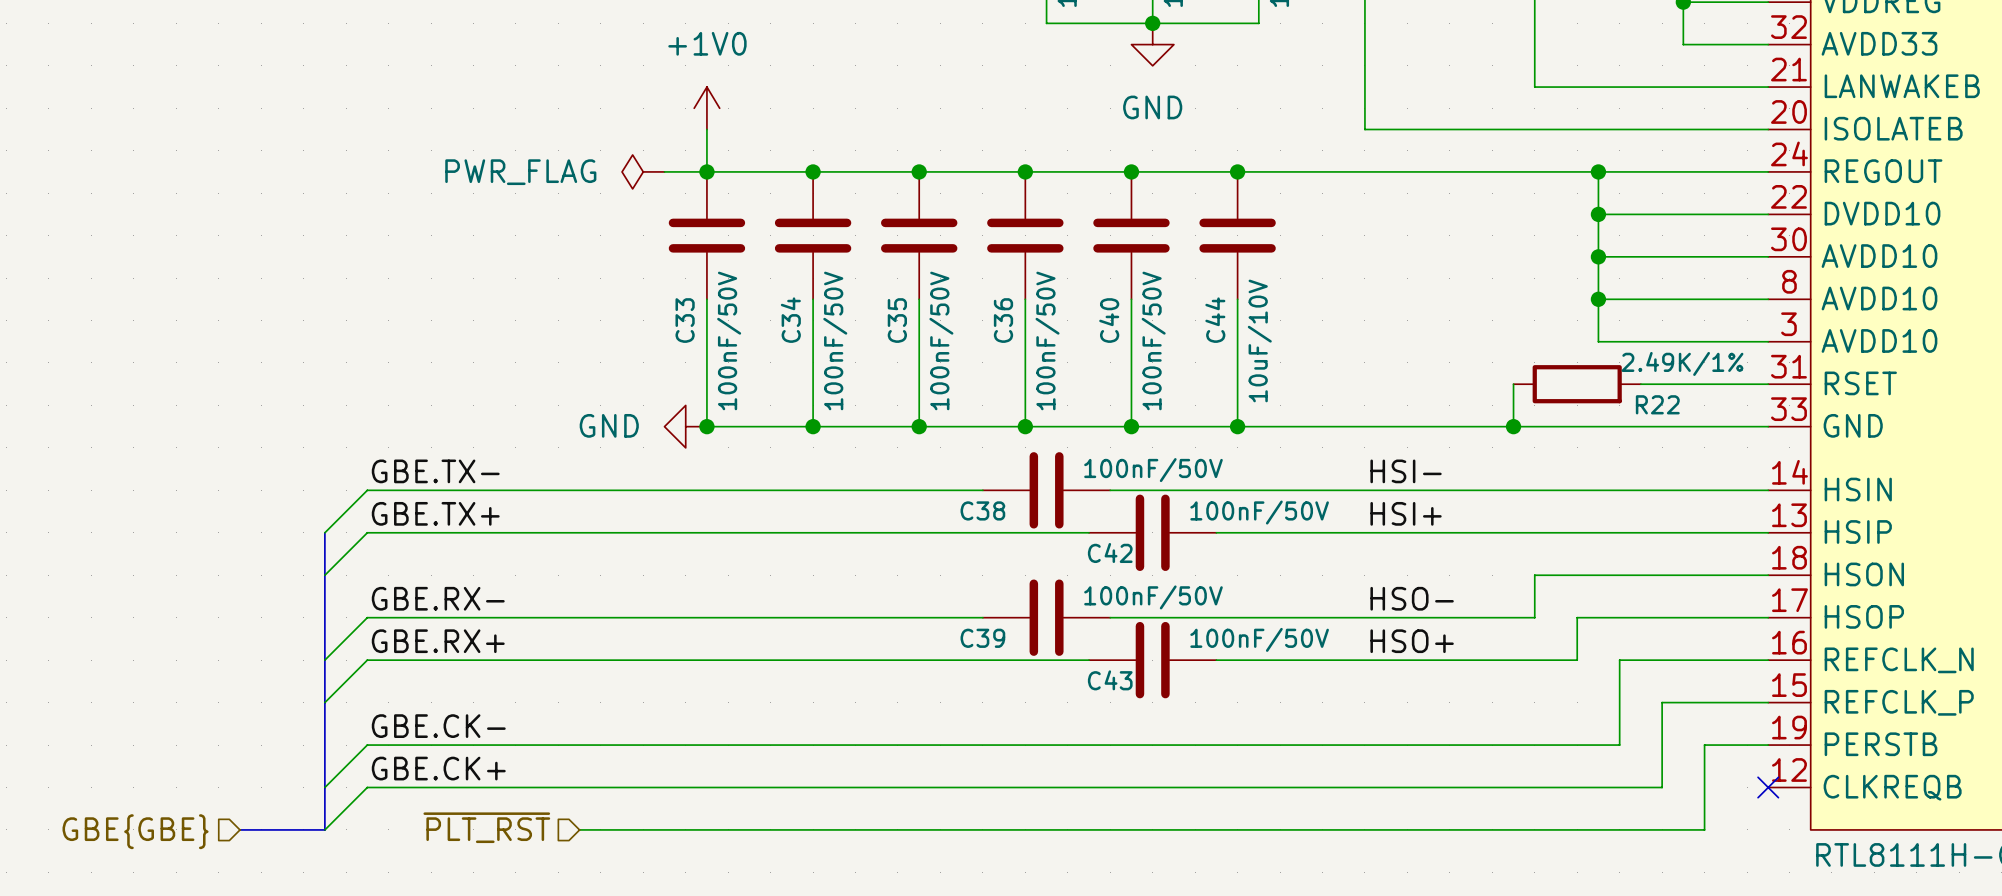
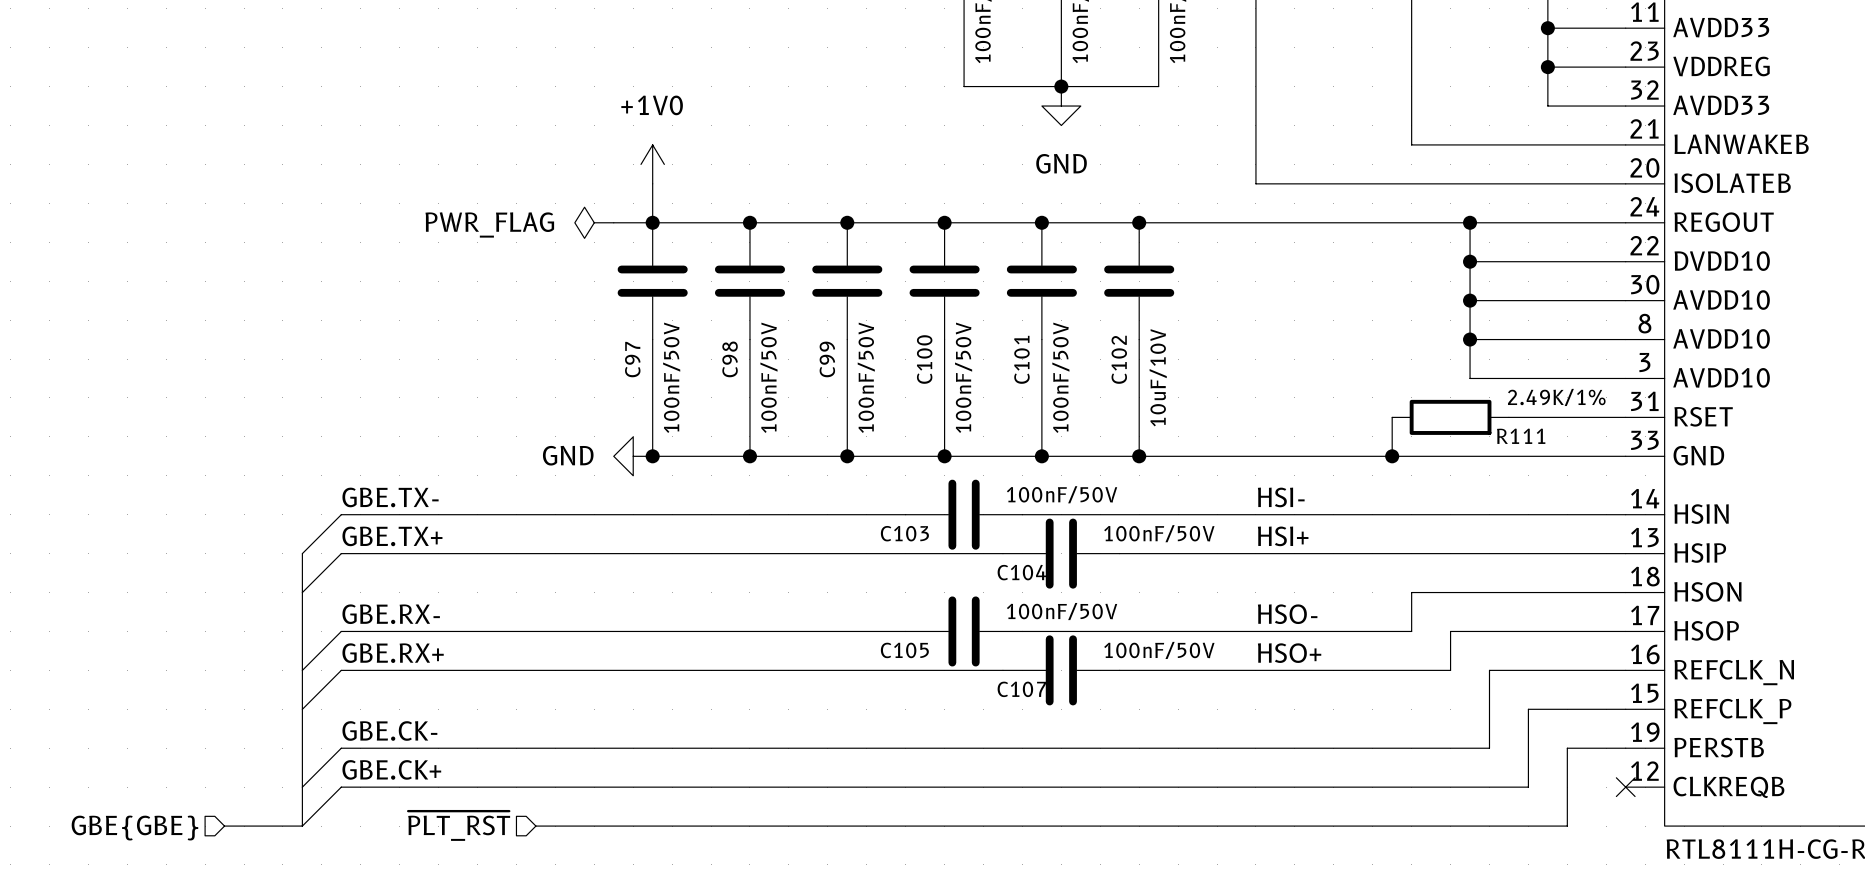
C33 name: C33 (685, 320) -> C97 (632, 359)
C34 name: C34 (790, 320) -> C98 (730, 359)
C35 name: C35 (897, 320) -> C99 (827, 359)
C36 name: C36 (1003, 320) -> C100 (924, 359)
C40 name: C40 (1109, 320) -> C101 (1021, 359)
C44 name: C44 (1215, 320) -> C102 (1119, 359)
R22 name: R22 (1657, 404) -> R111 (1521, 436)
C38 name: C38 (982, 510) -> C103 (904, 533)
C42 name: C42 (1110, 552) -> C104 (1021, 572)
C39 name: C39 (982, 638) -> C105 (904, 650)
C43 name: C43 (1110, 680) -> C107 (1021, 689)

